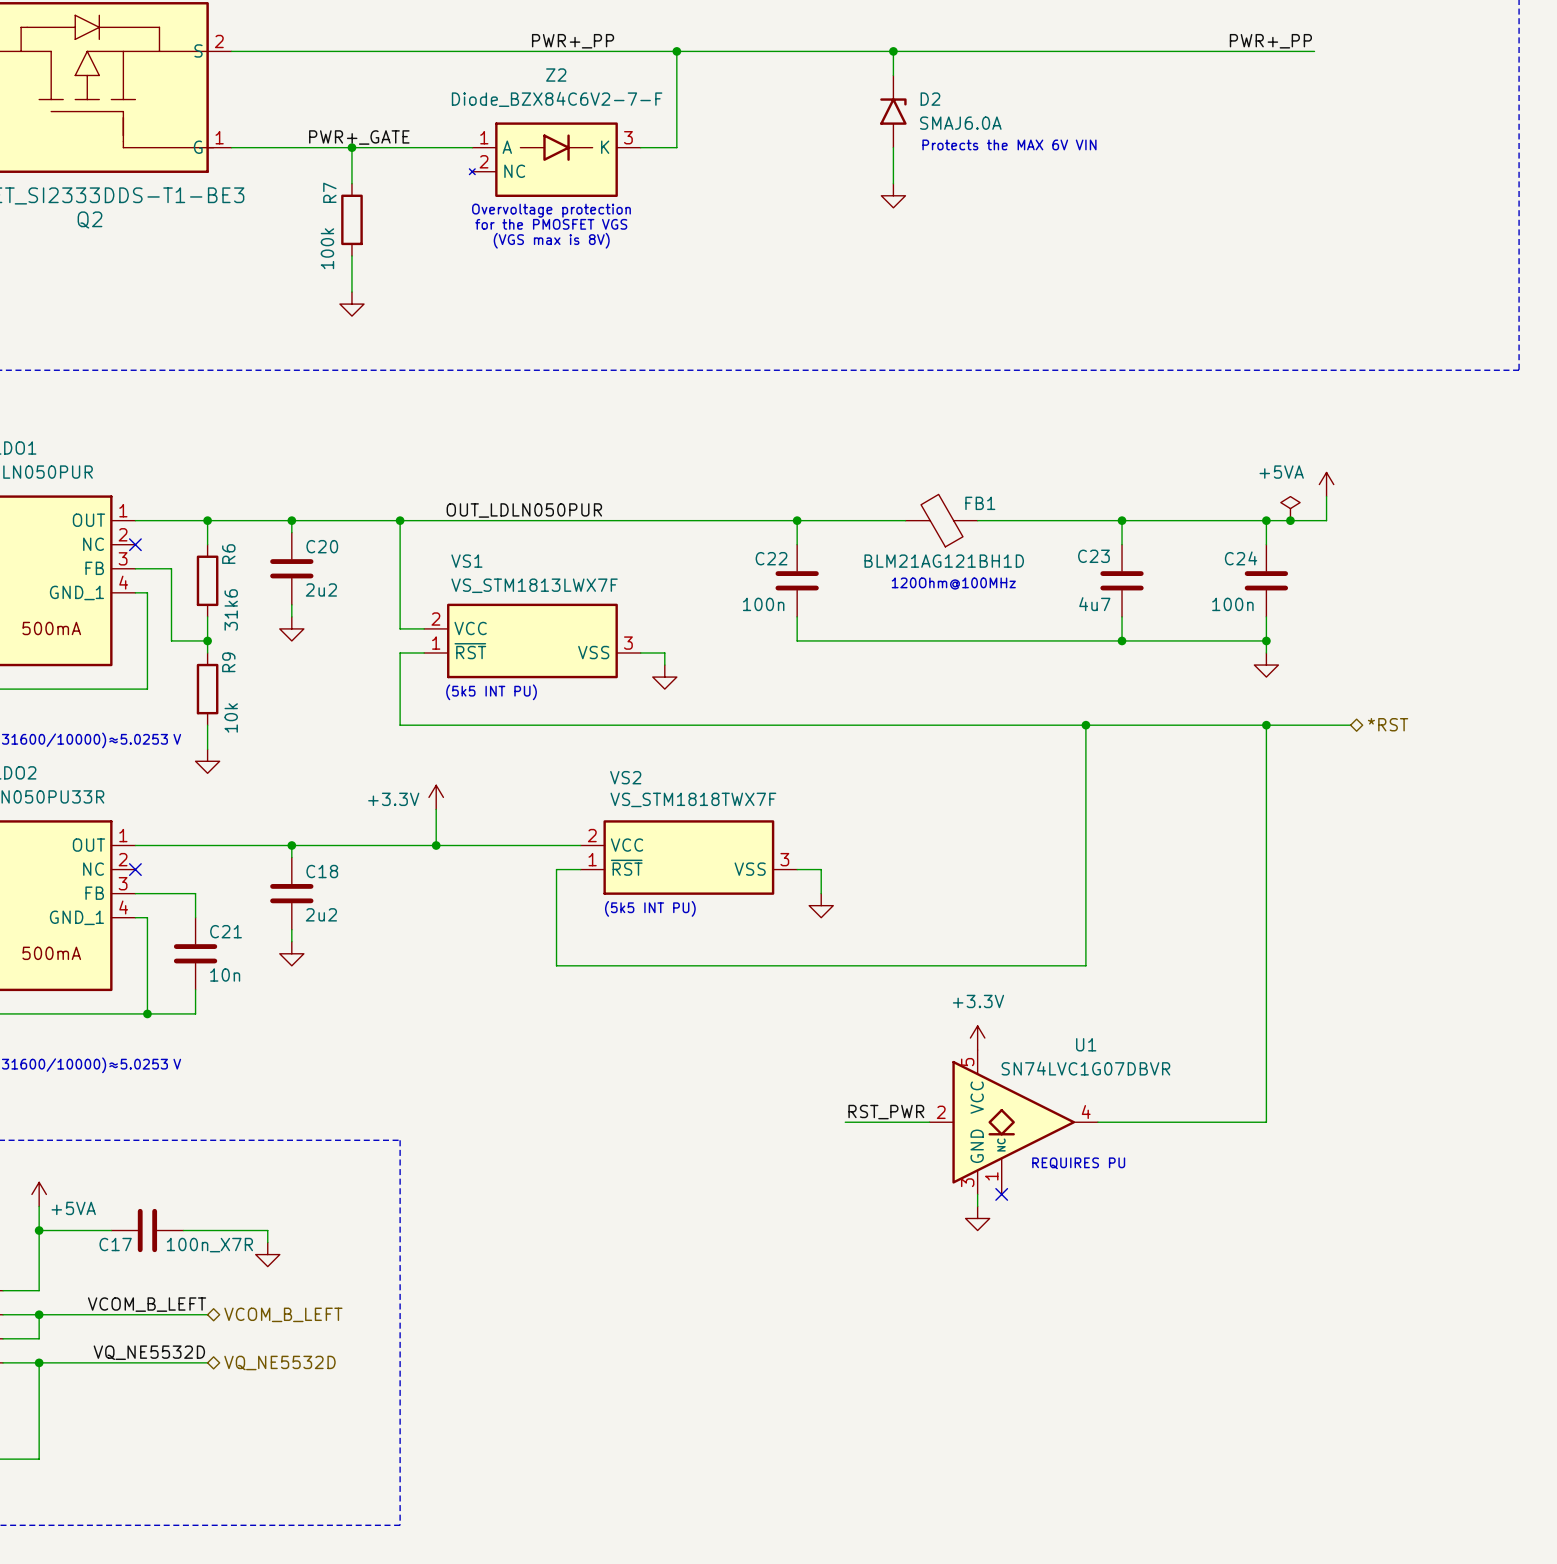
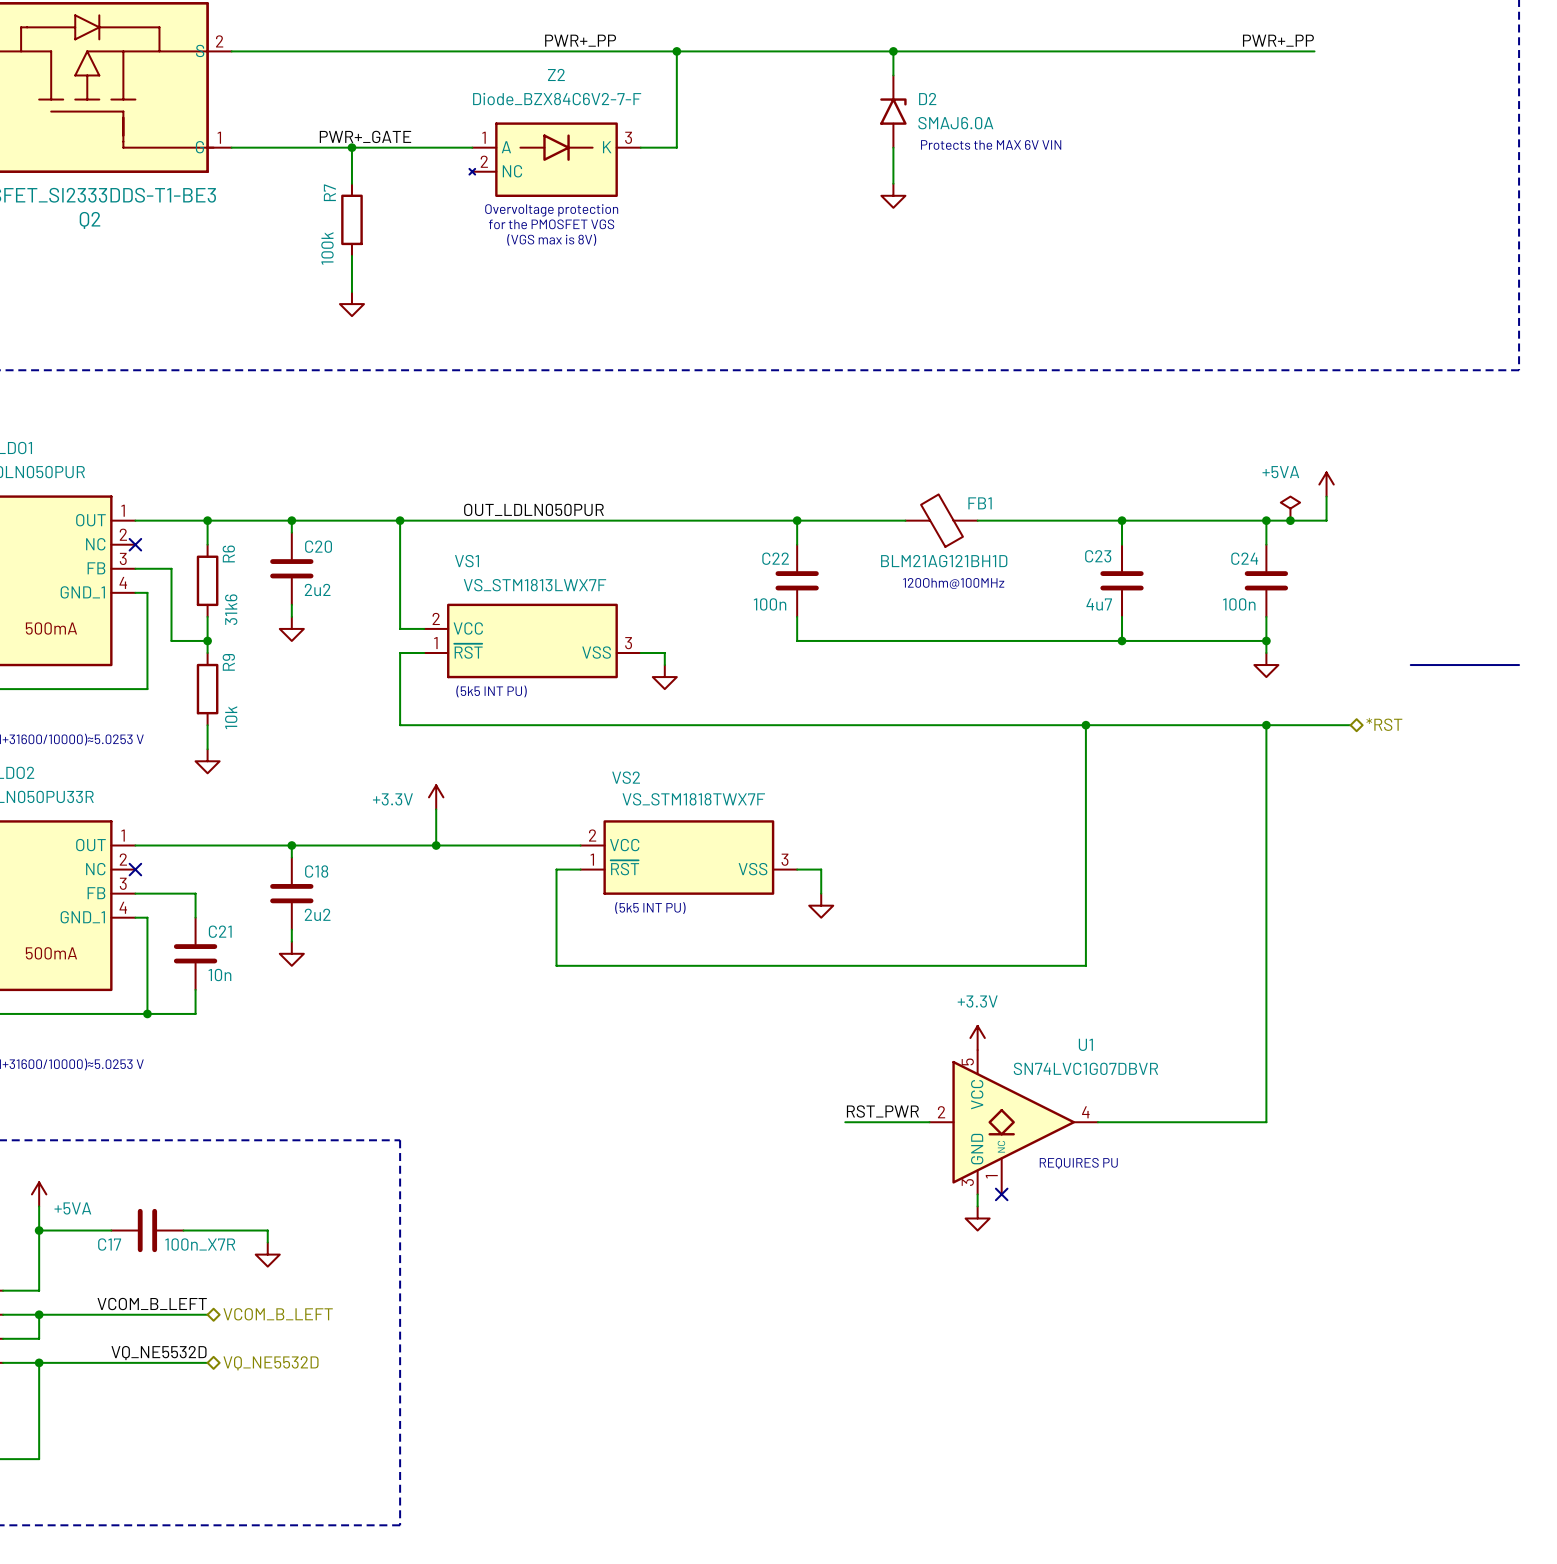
line: none -> (1410, 665) (1519, 665)

